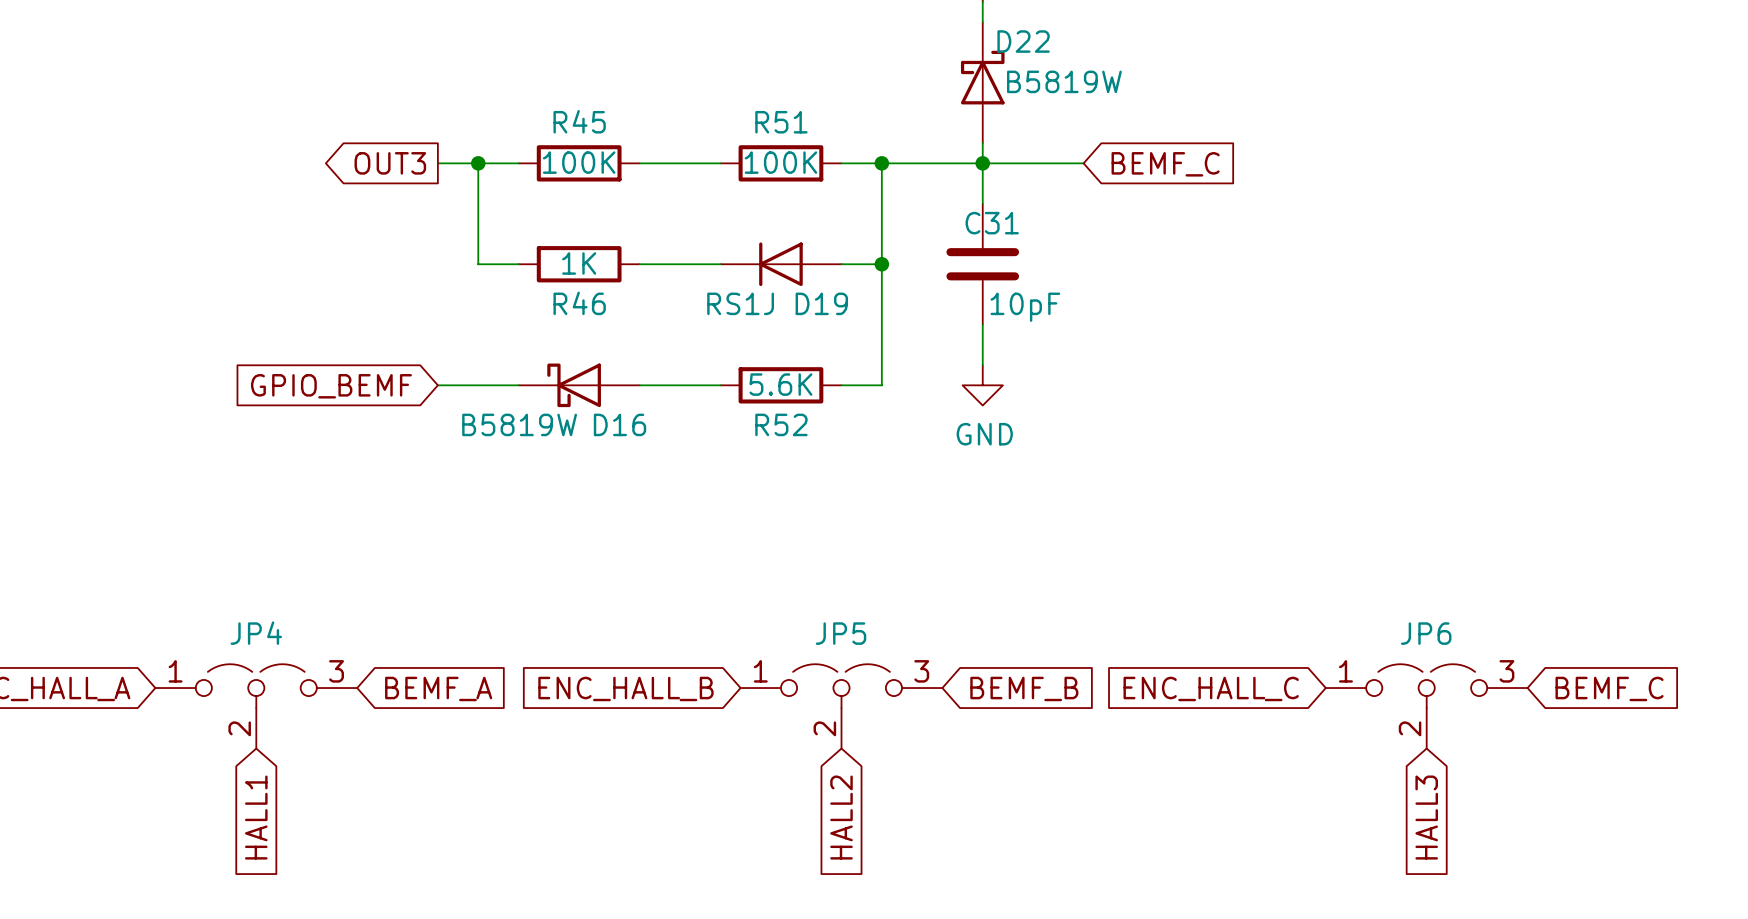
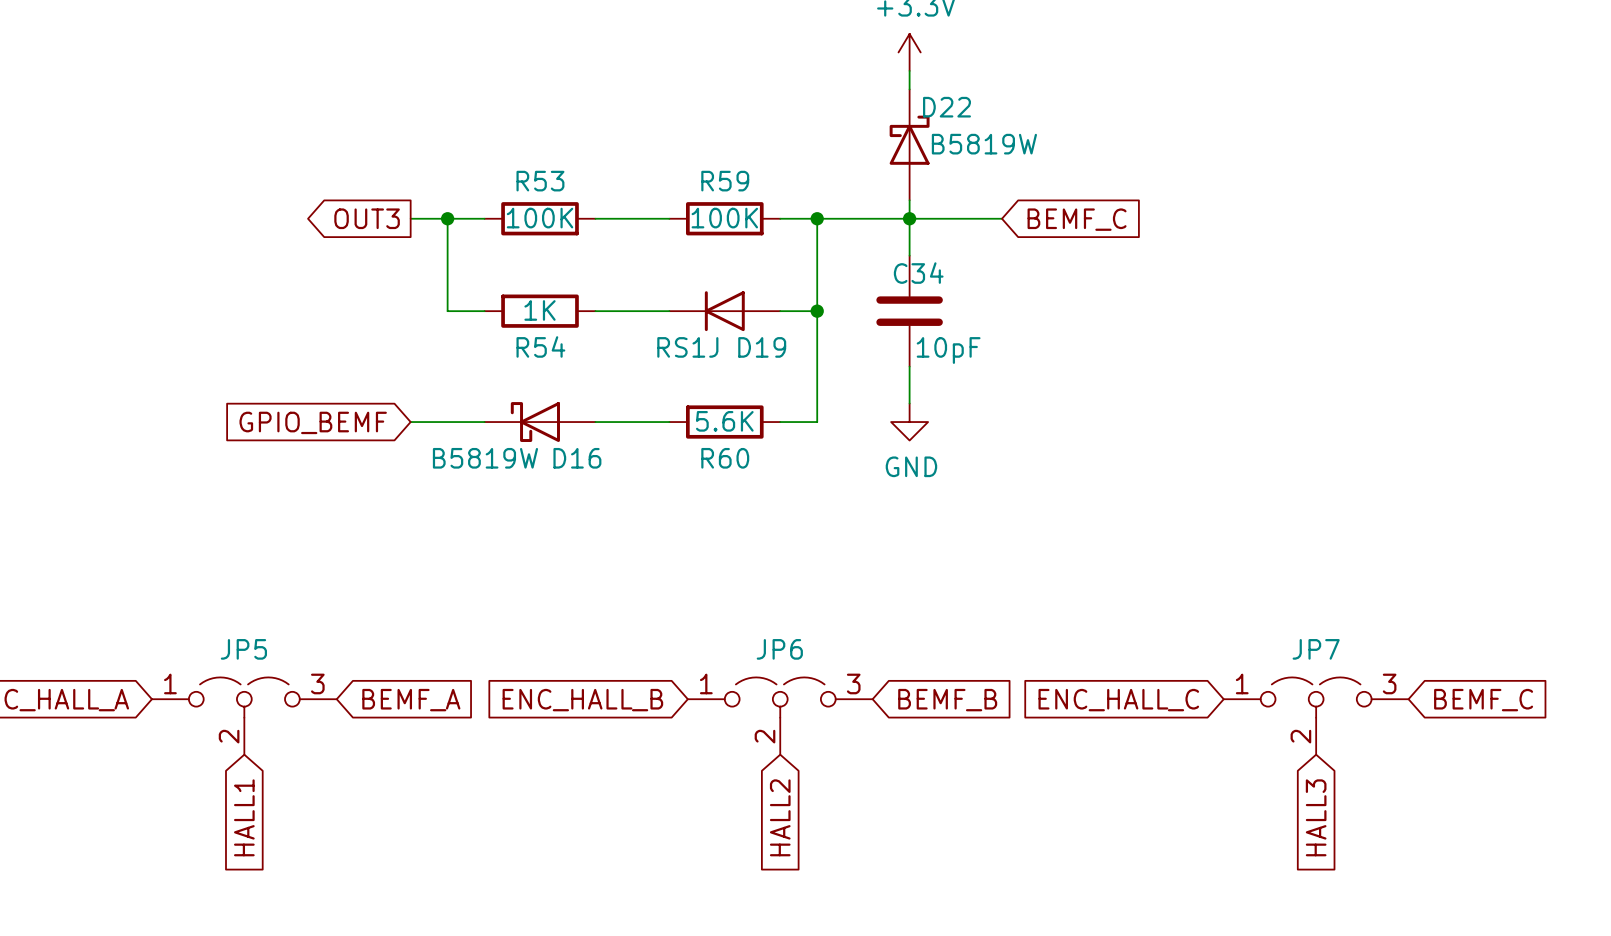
R45 name: R45 (579, 121) -> R53 (540, 181)
R51 name: R51 (781, 122) -> R59 (725, 181)
C31 name: C31 (992, 223) -> C34 (918, 273)
R46 name: R46 (579, 303) -> R54 (540, 346)
R52 name: R52 (781, 424) -> R60 (725, 458)
JP4 name: JP4 (256, 633) -> JP5 (243, 649)
JP5 name: JP5 (841, 633) -> JP6 (779, 649)
JP6 name: JP6 (1426, 633) -> JP7 (1316, 649)

